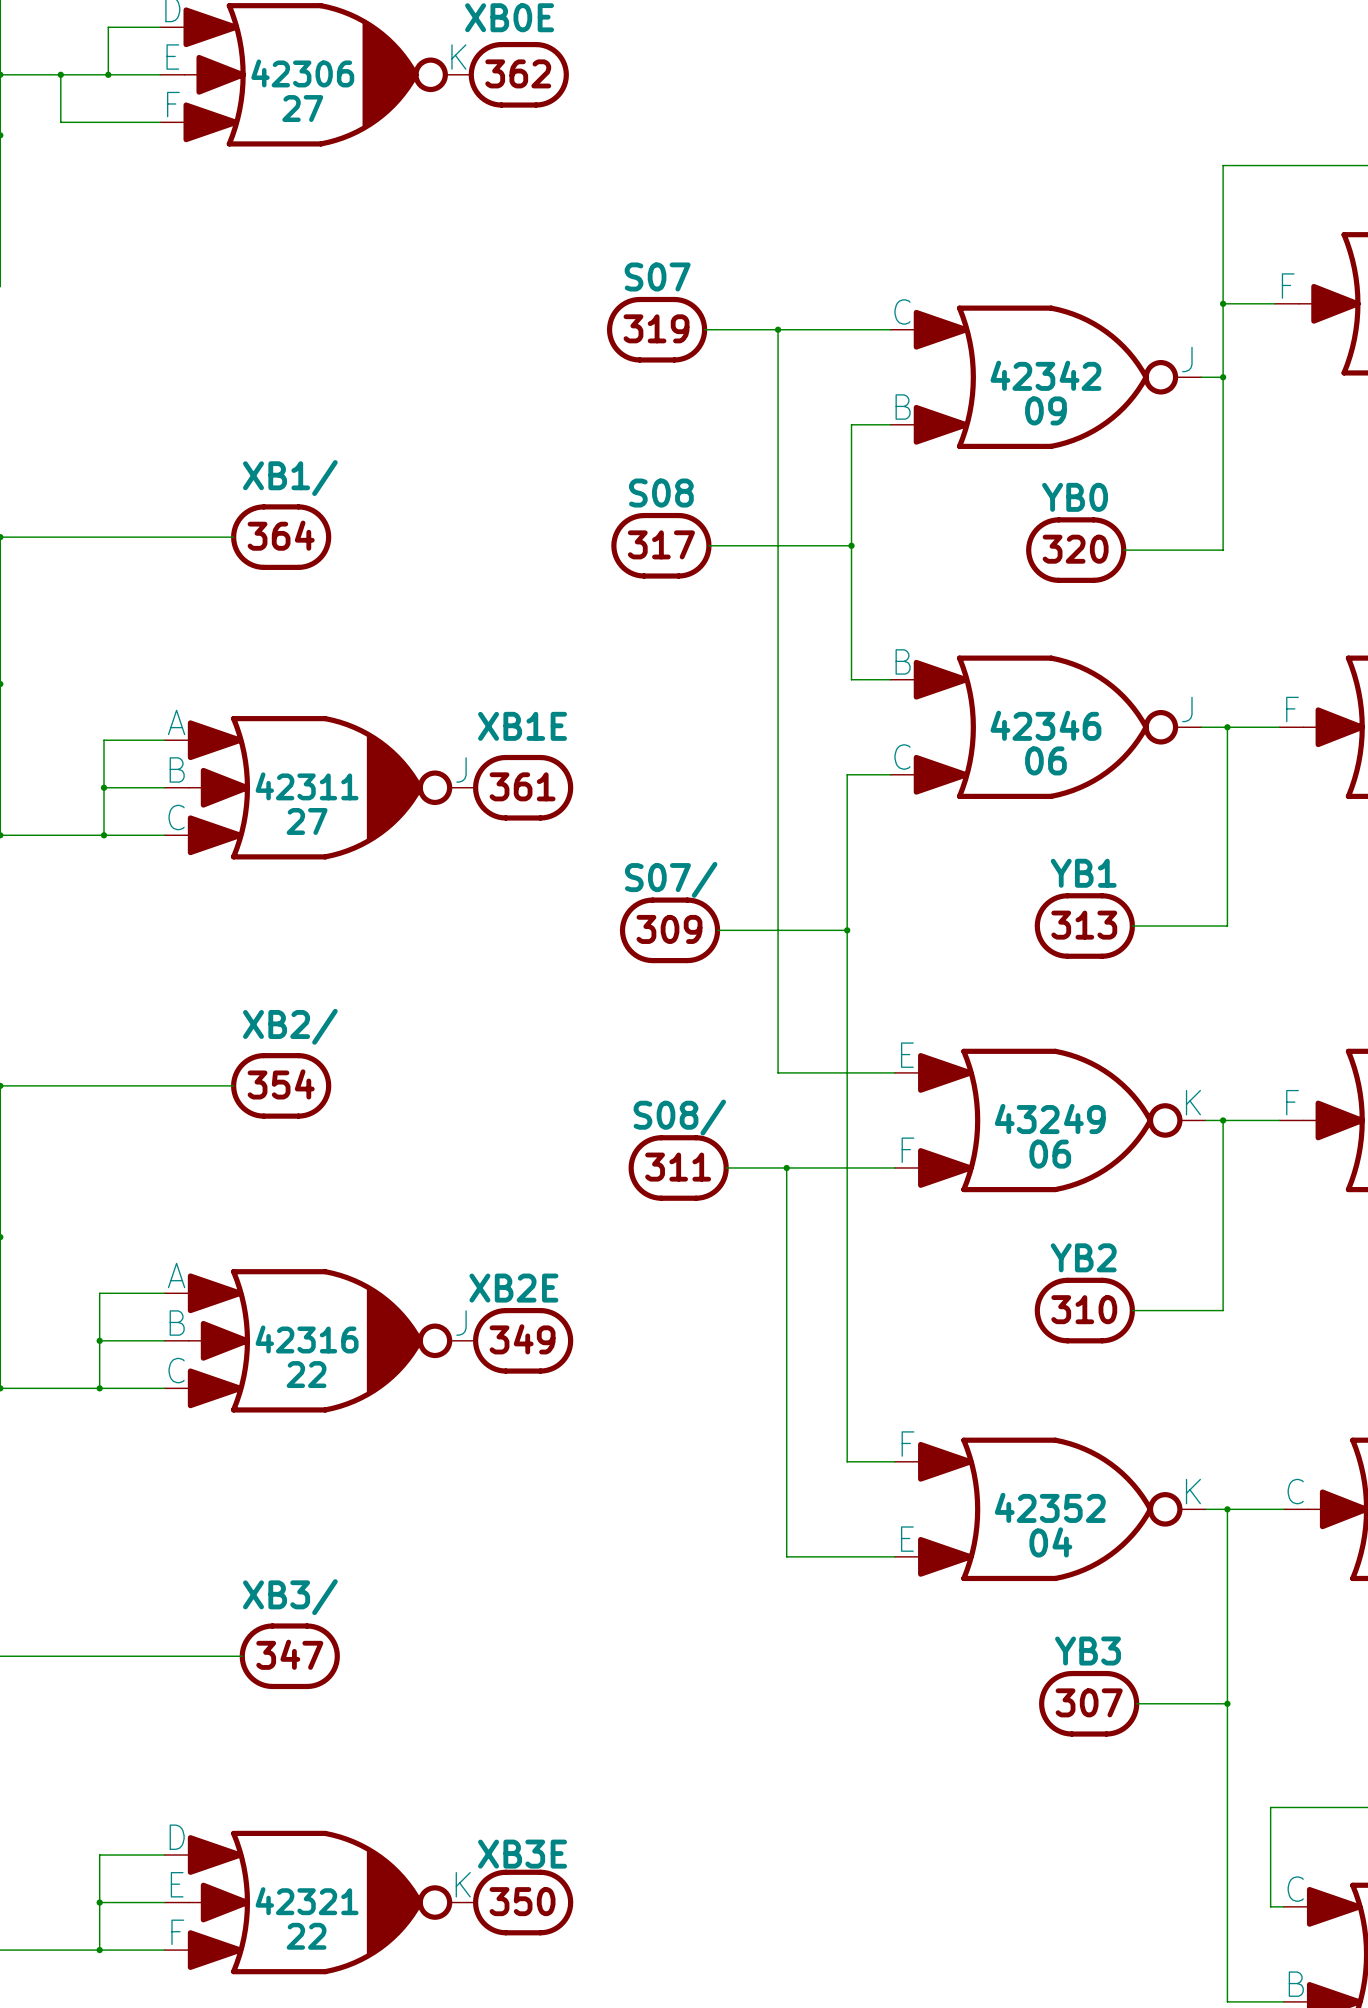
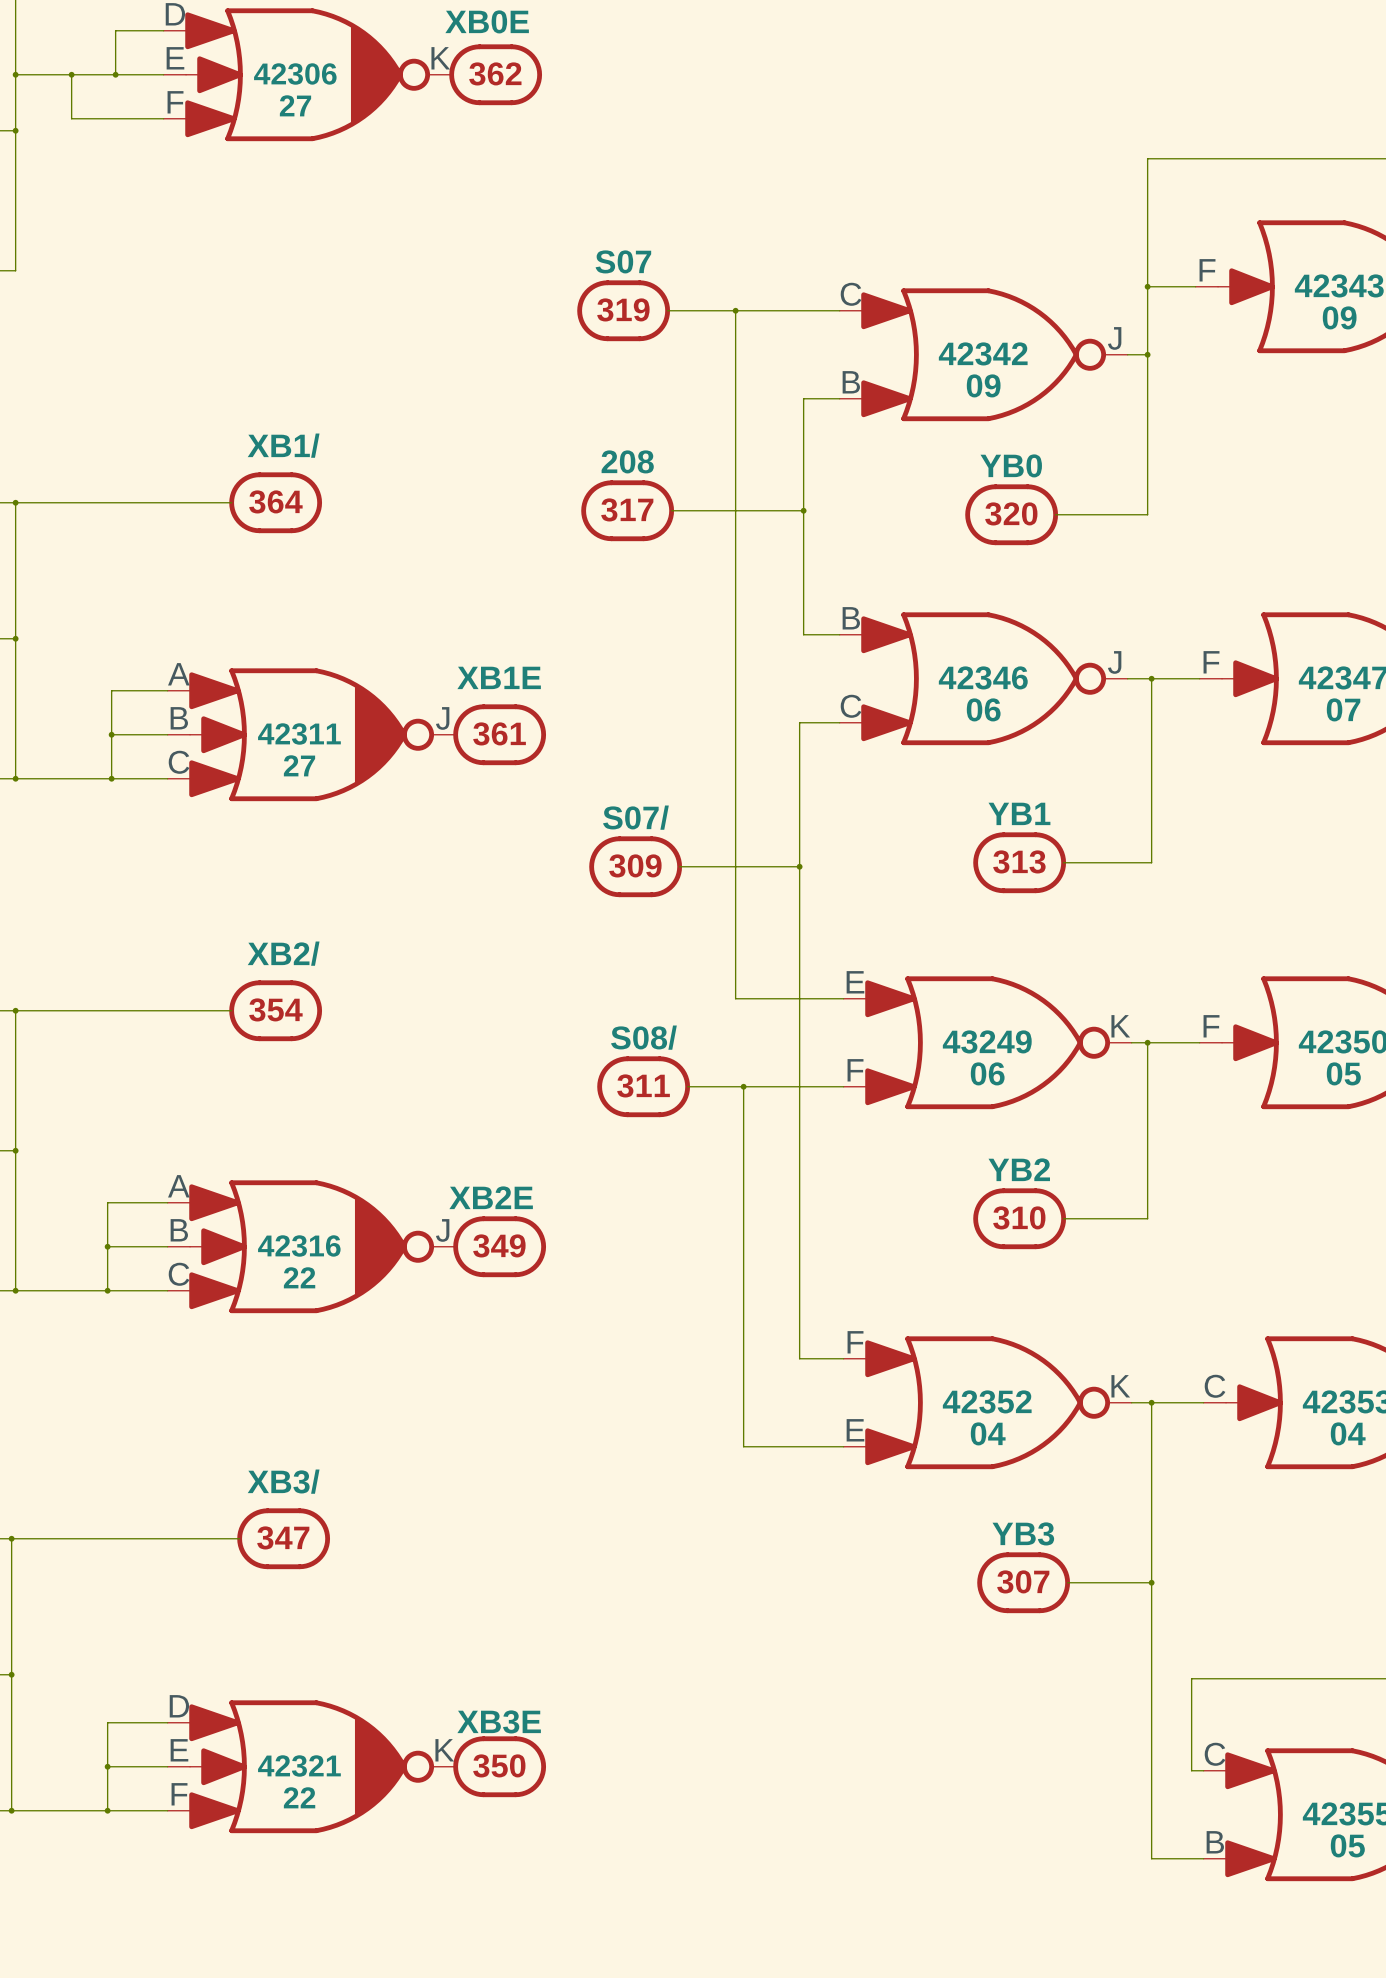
part text: S08 (661, 493) -> 208 (627, 461)

